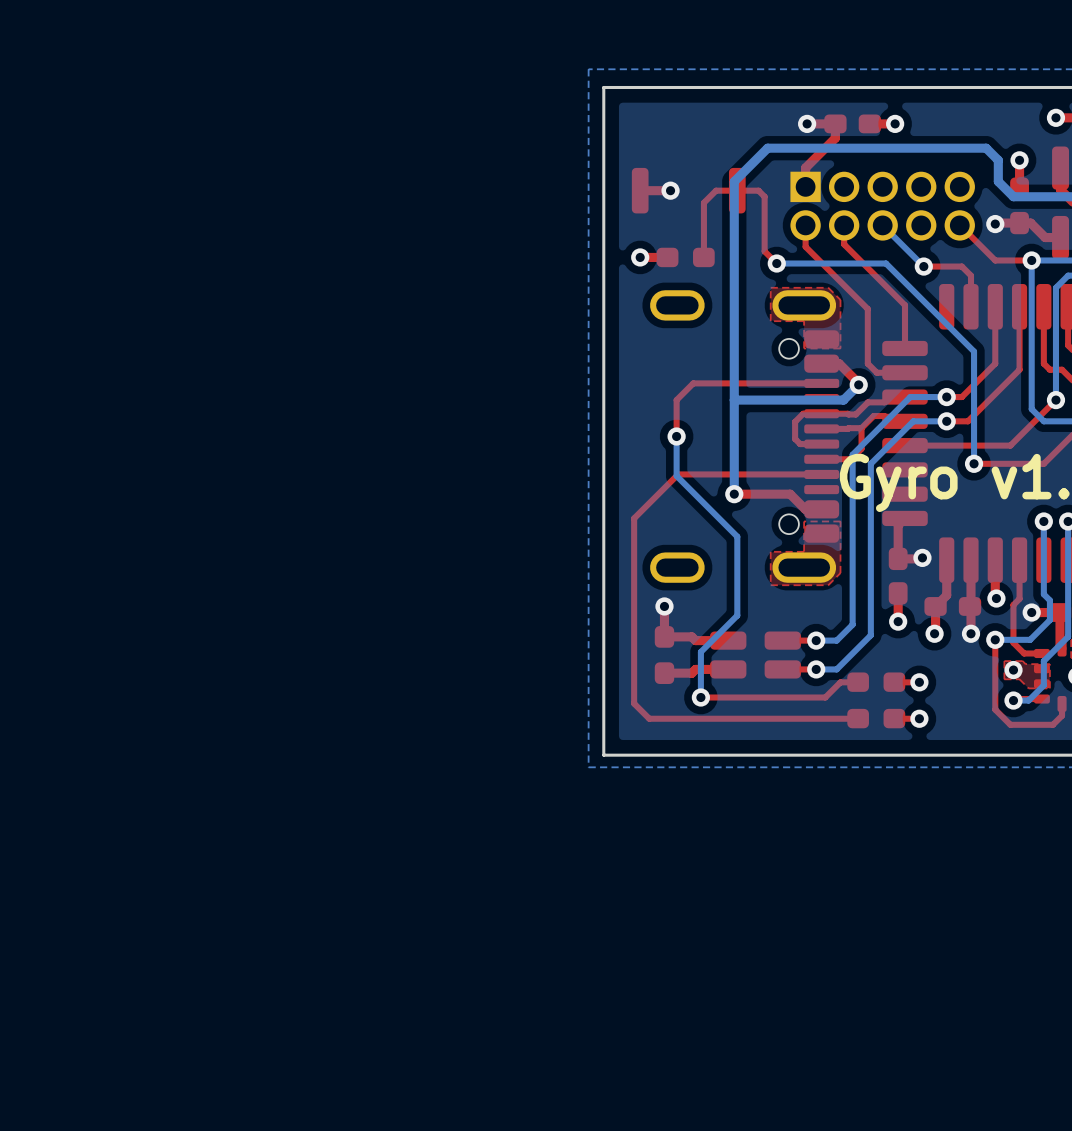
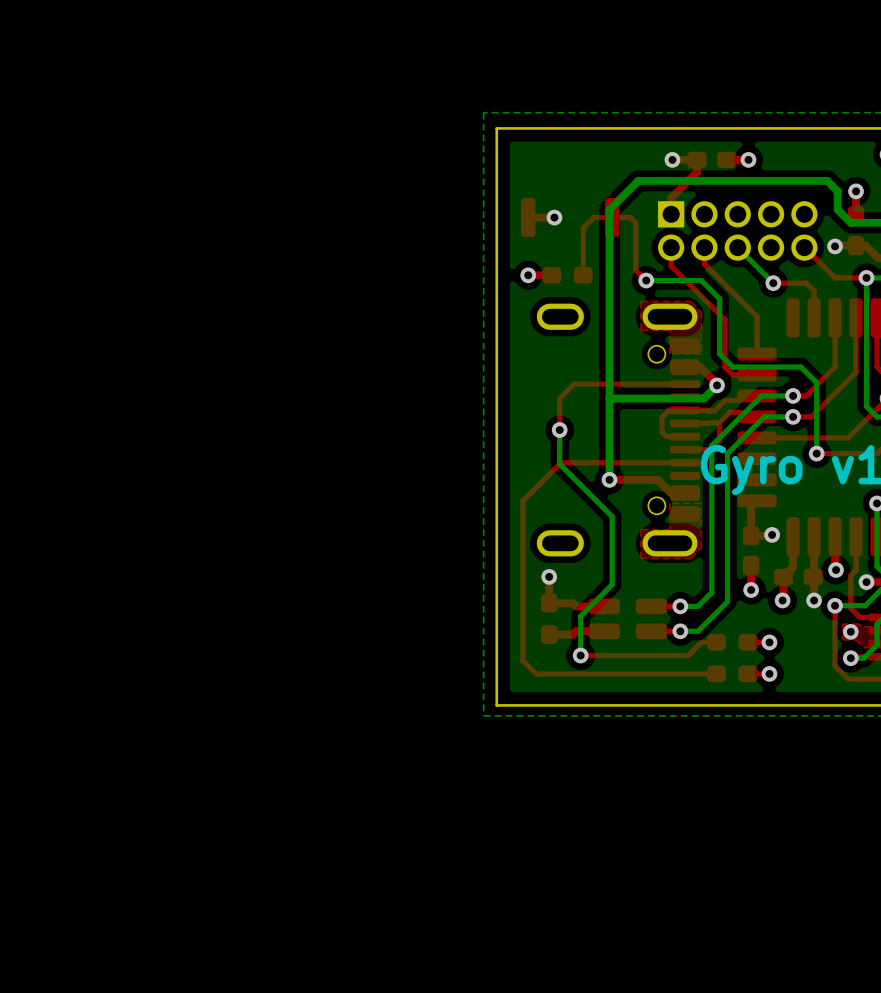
bottom track: (840, 263) (886, 263) (974, 351) (974, 381) -> (701, 280) (719, 298) (719, 353) (732, 367) (800, 367) (816, 382)

